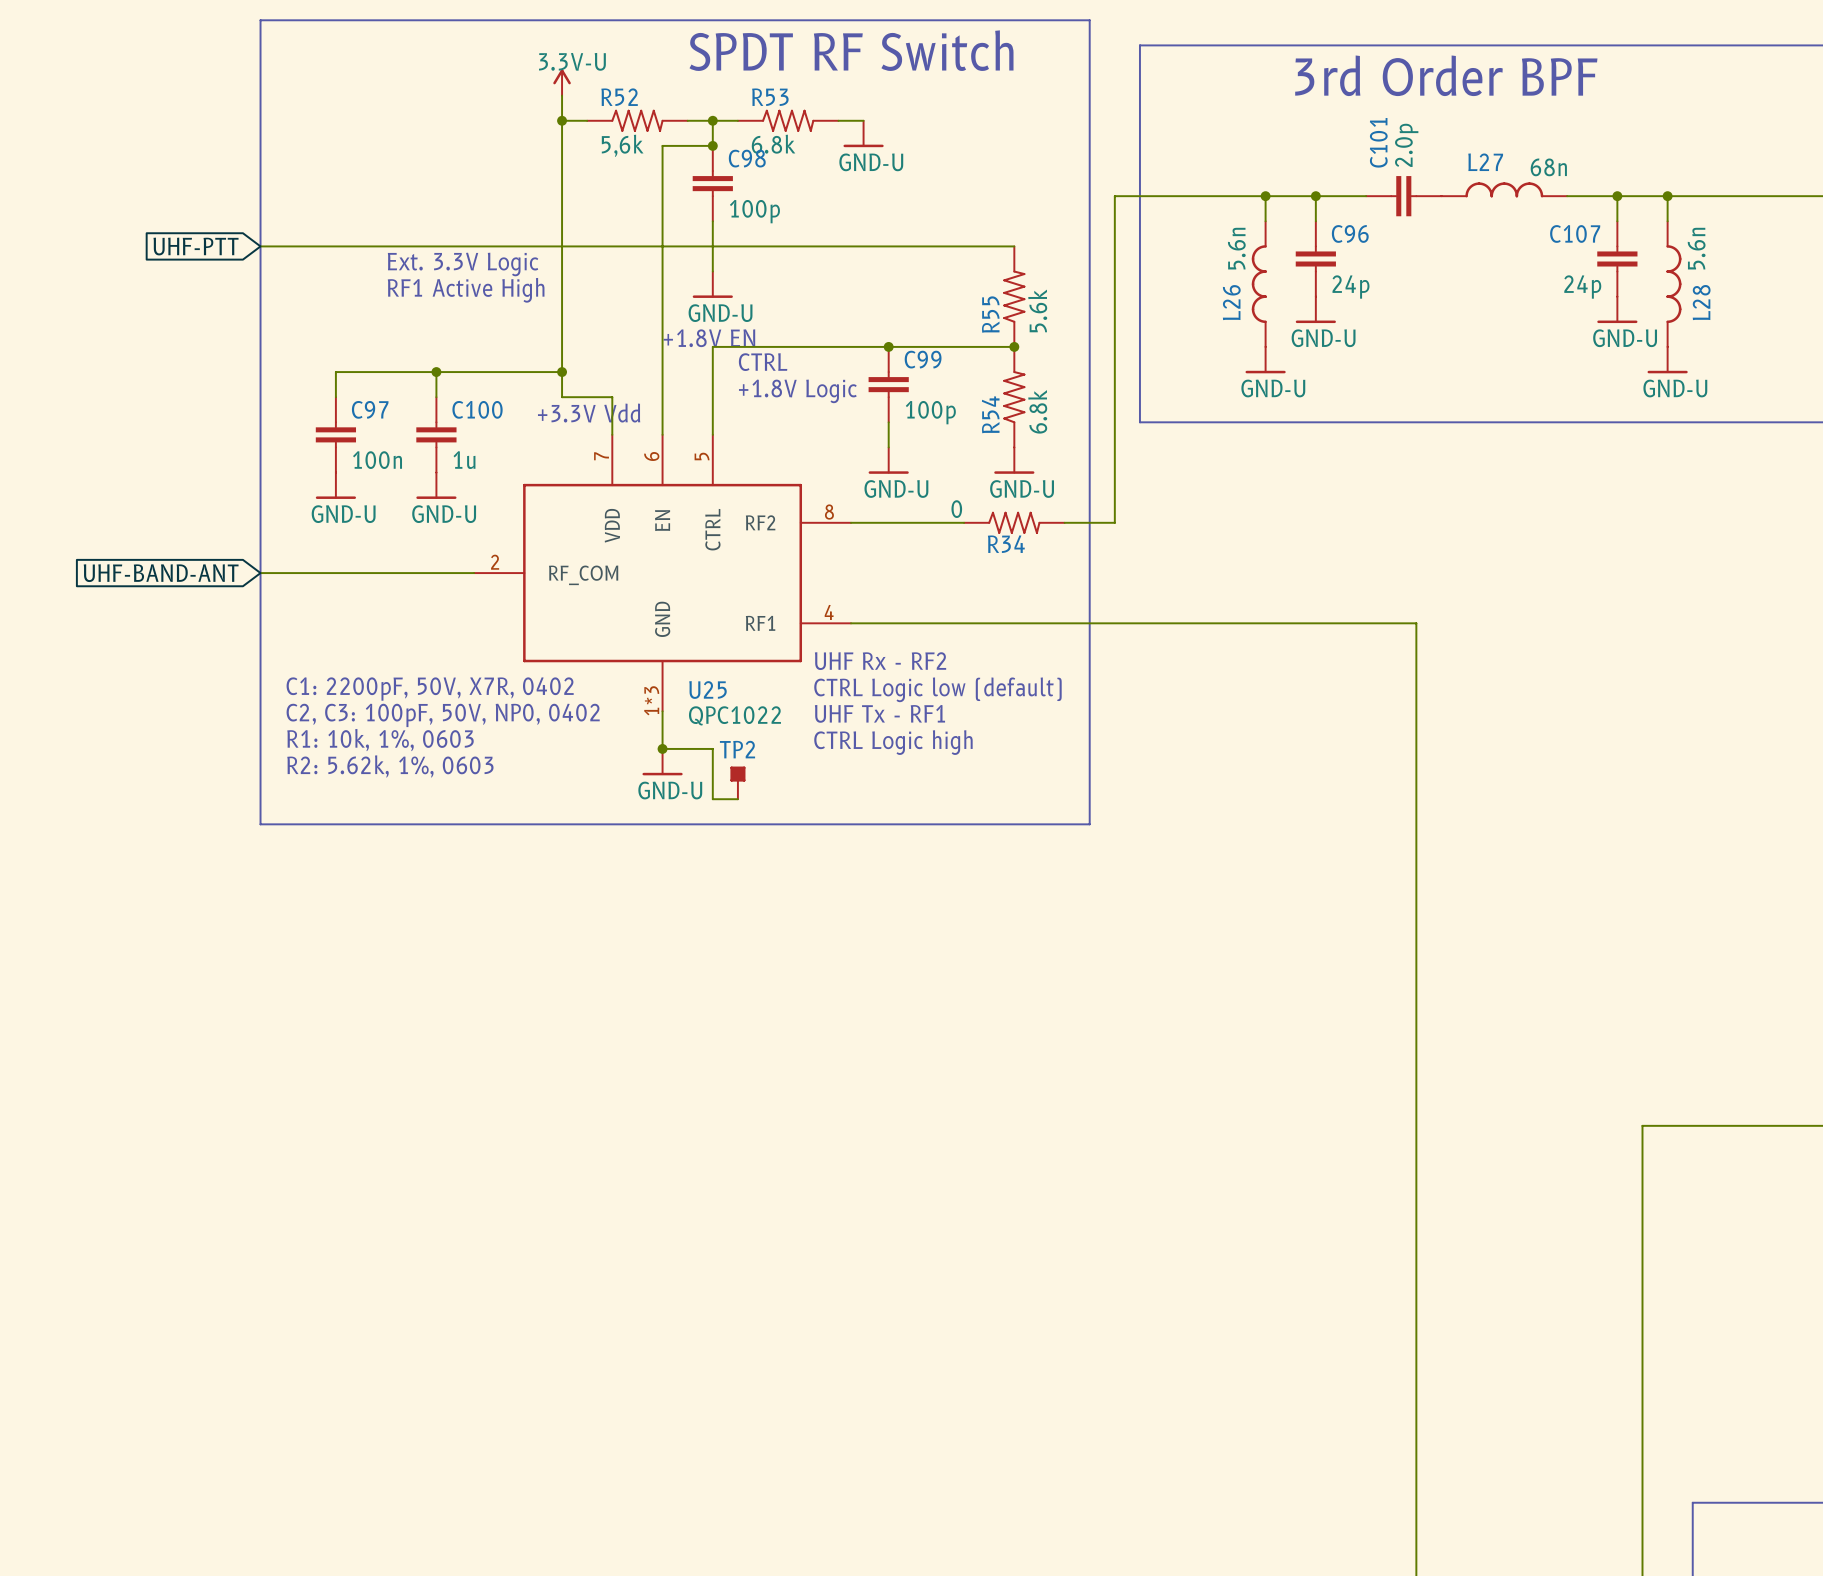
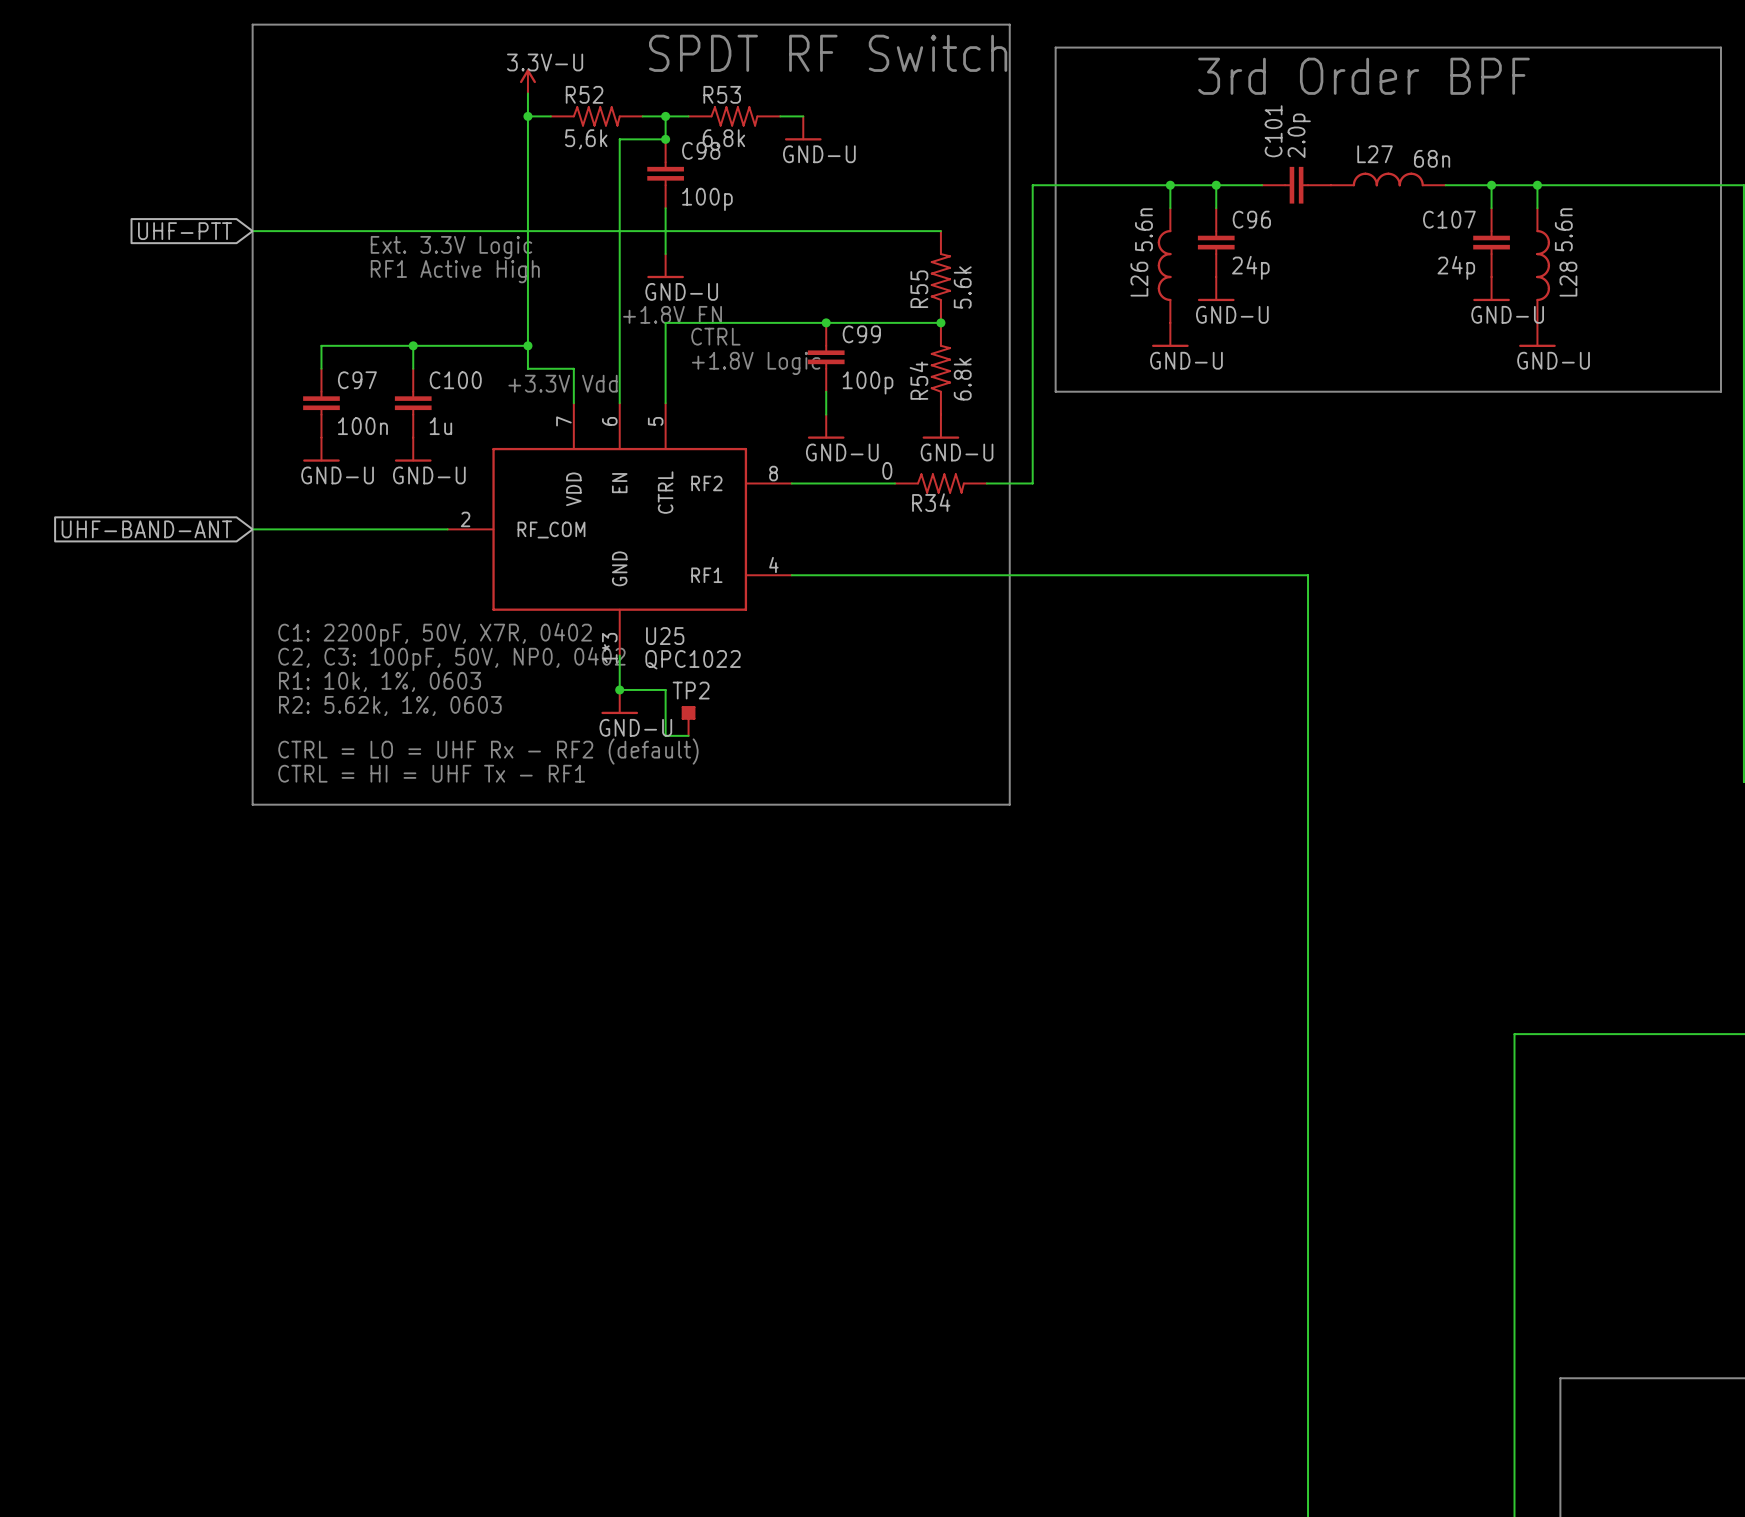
text: UHF Rx - RF2 (880, 661) -> none
text: CTRL Logic low (default) (937, 689) -> none
text: UHF Tx - RF1 (879, 713) -> none
text: CTRL Logic high (893, 742) -> none
text: none -> CTRL = LO = UHF Rx - RF2 (default) (488, 751)
line: (260, 824) (1089, 824) -> (252, 758) (252, 804) (1009, 804) (1009, 758)
text: none -> CTRL = HI = UHF Tx - RF1 (431, 773)

